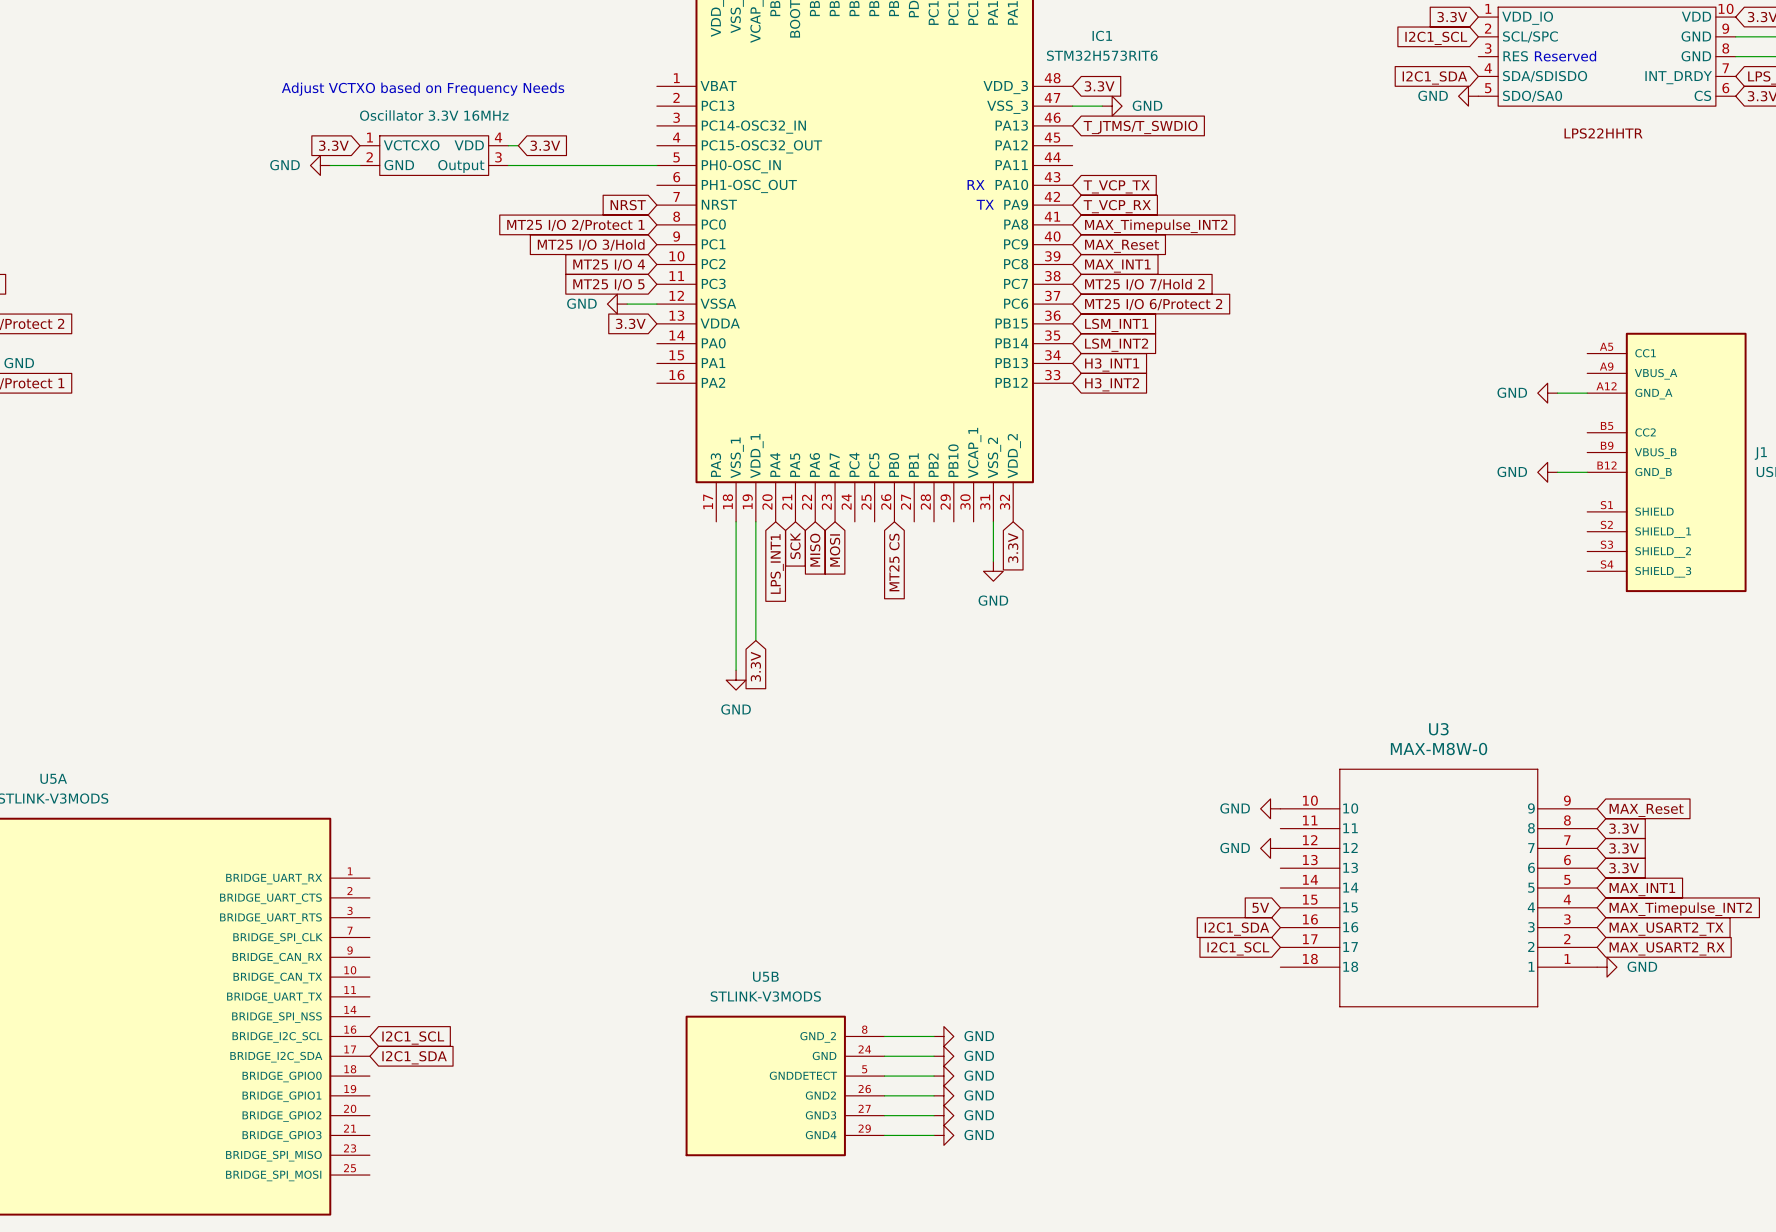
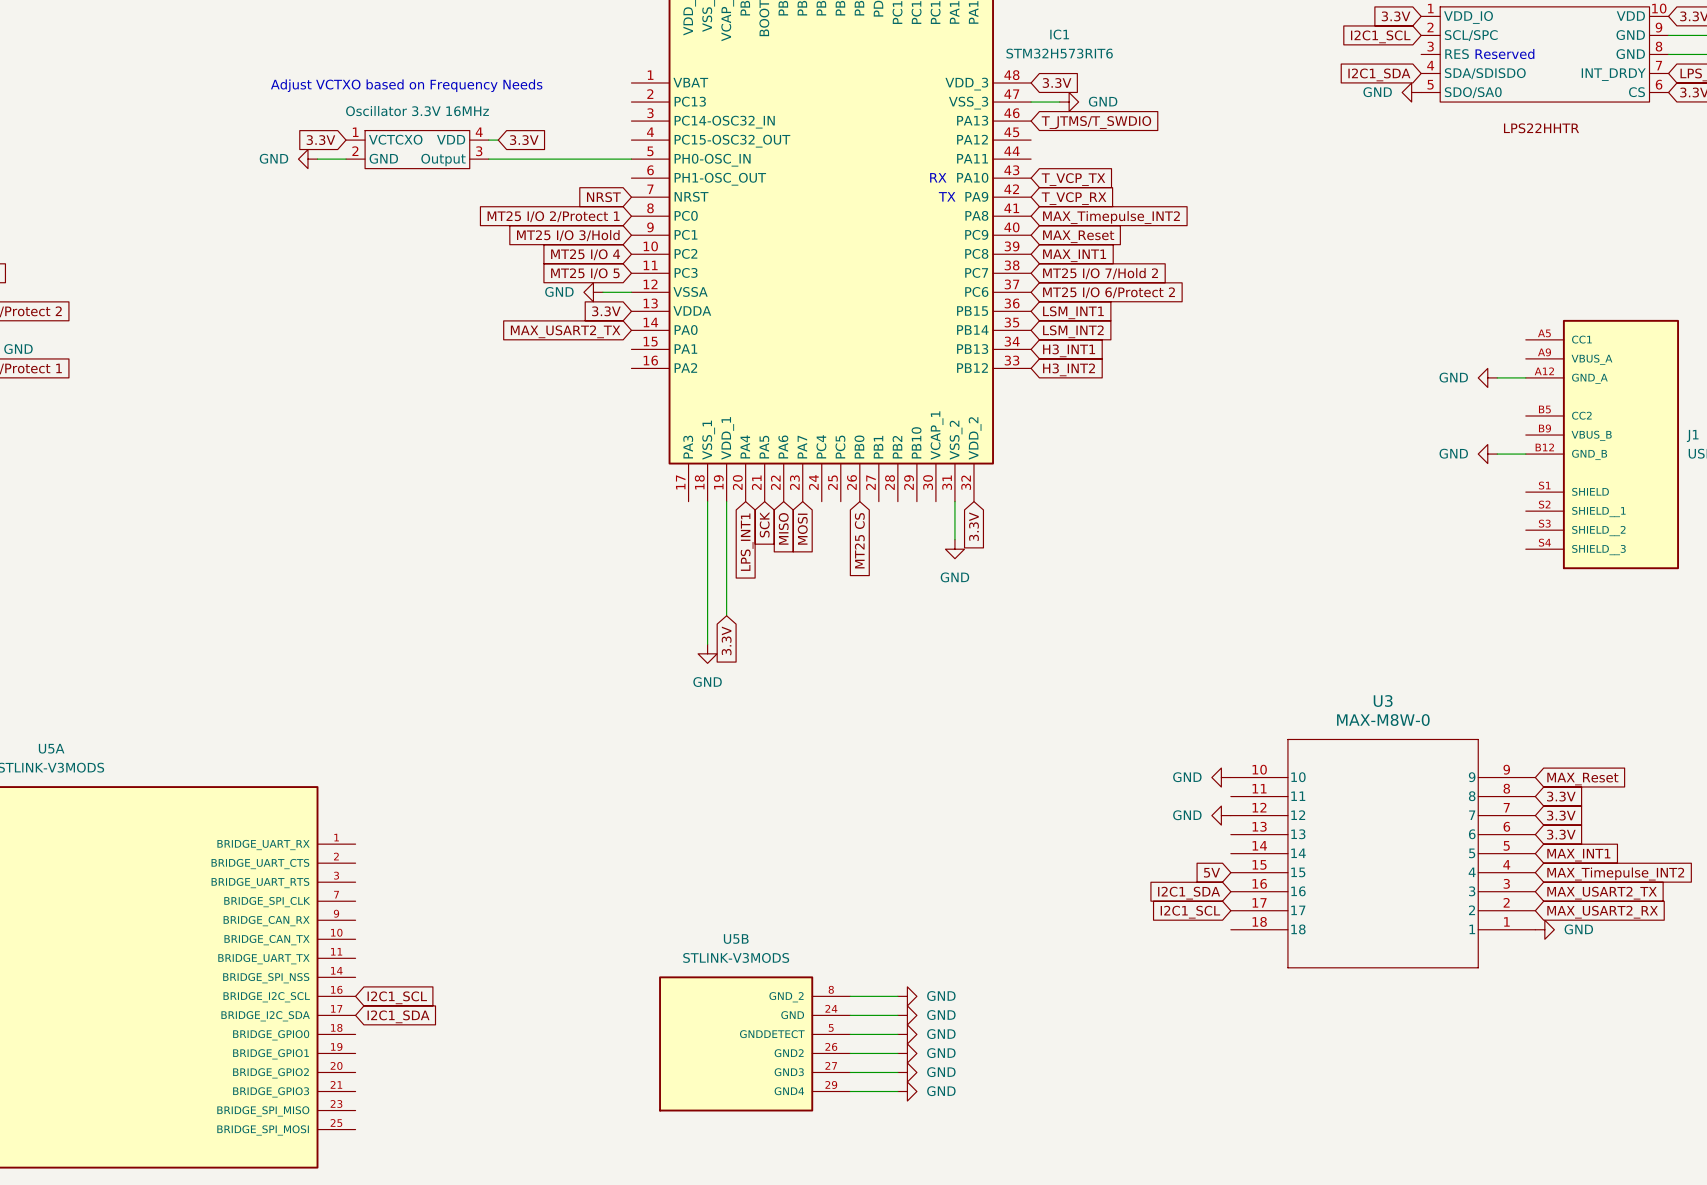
global label: none -> MAX_USART2_TX (565, 331)

